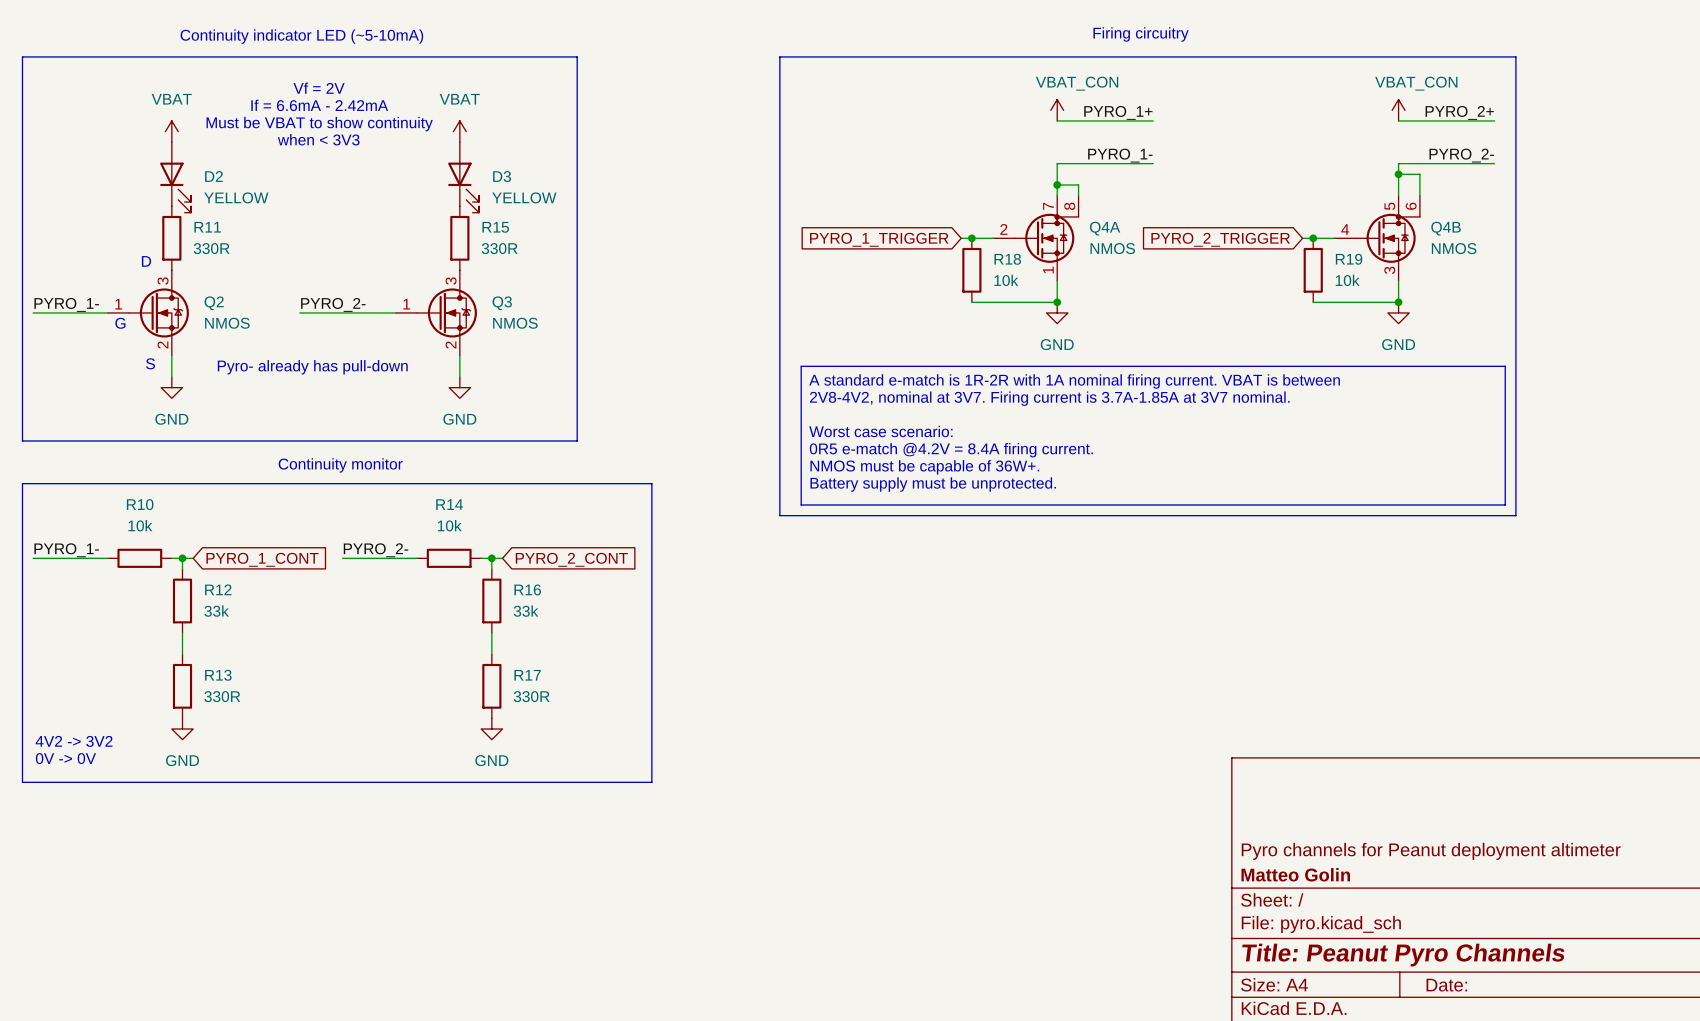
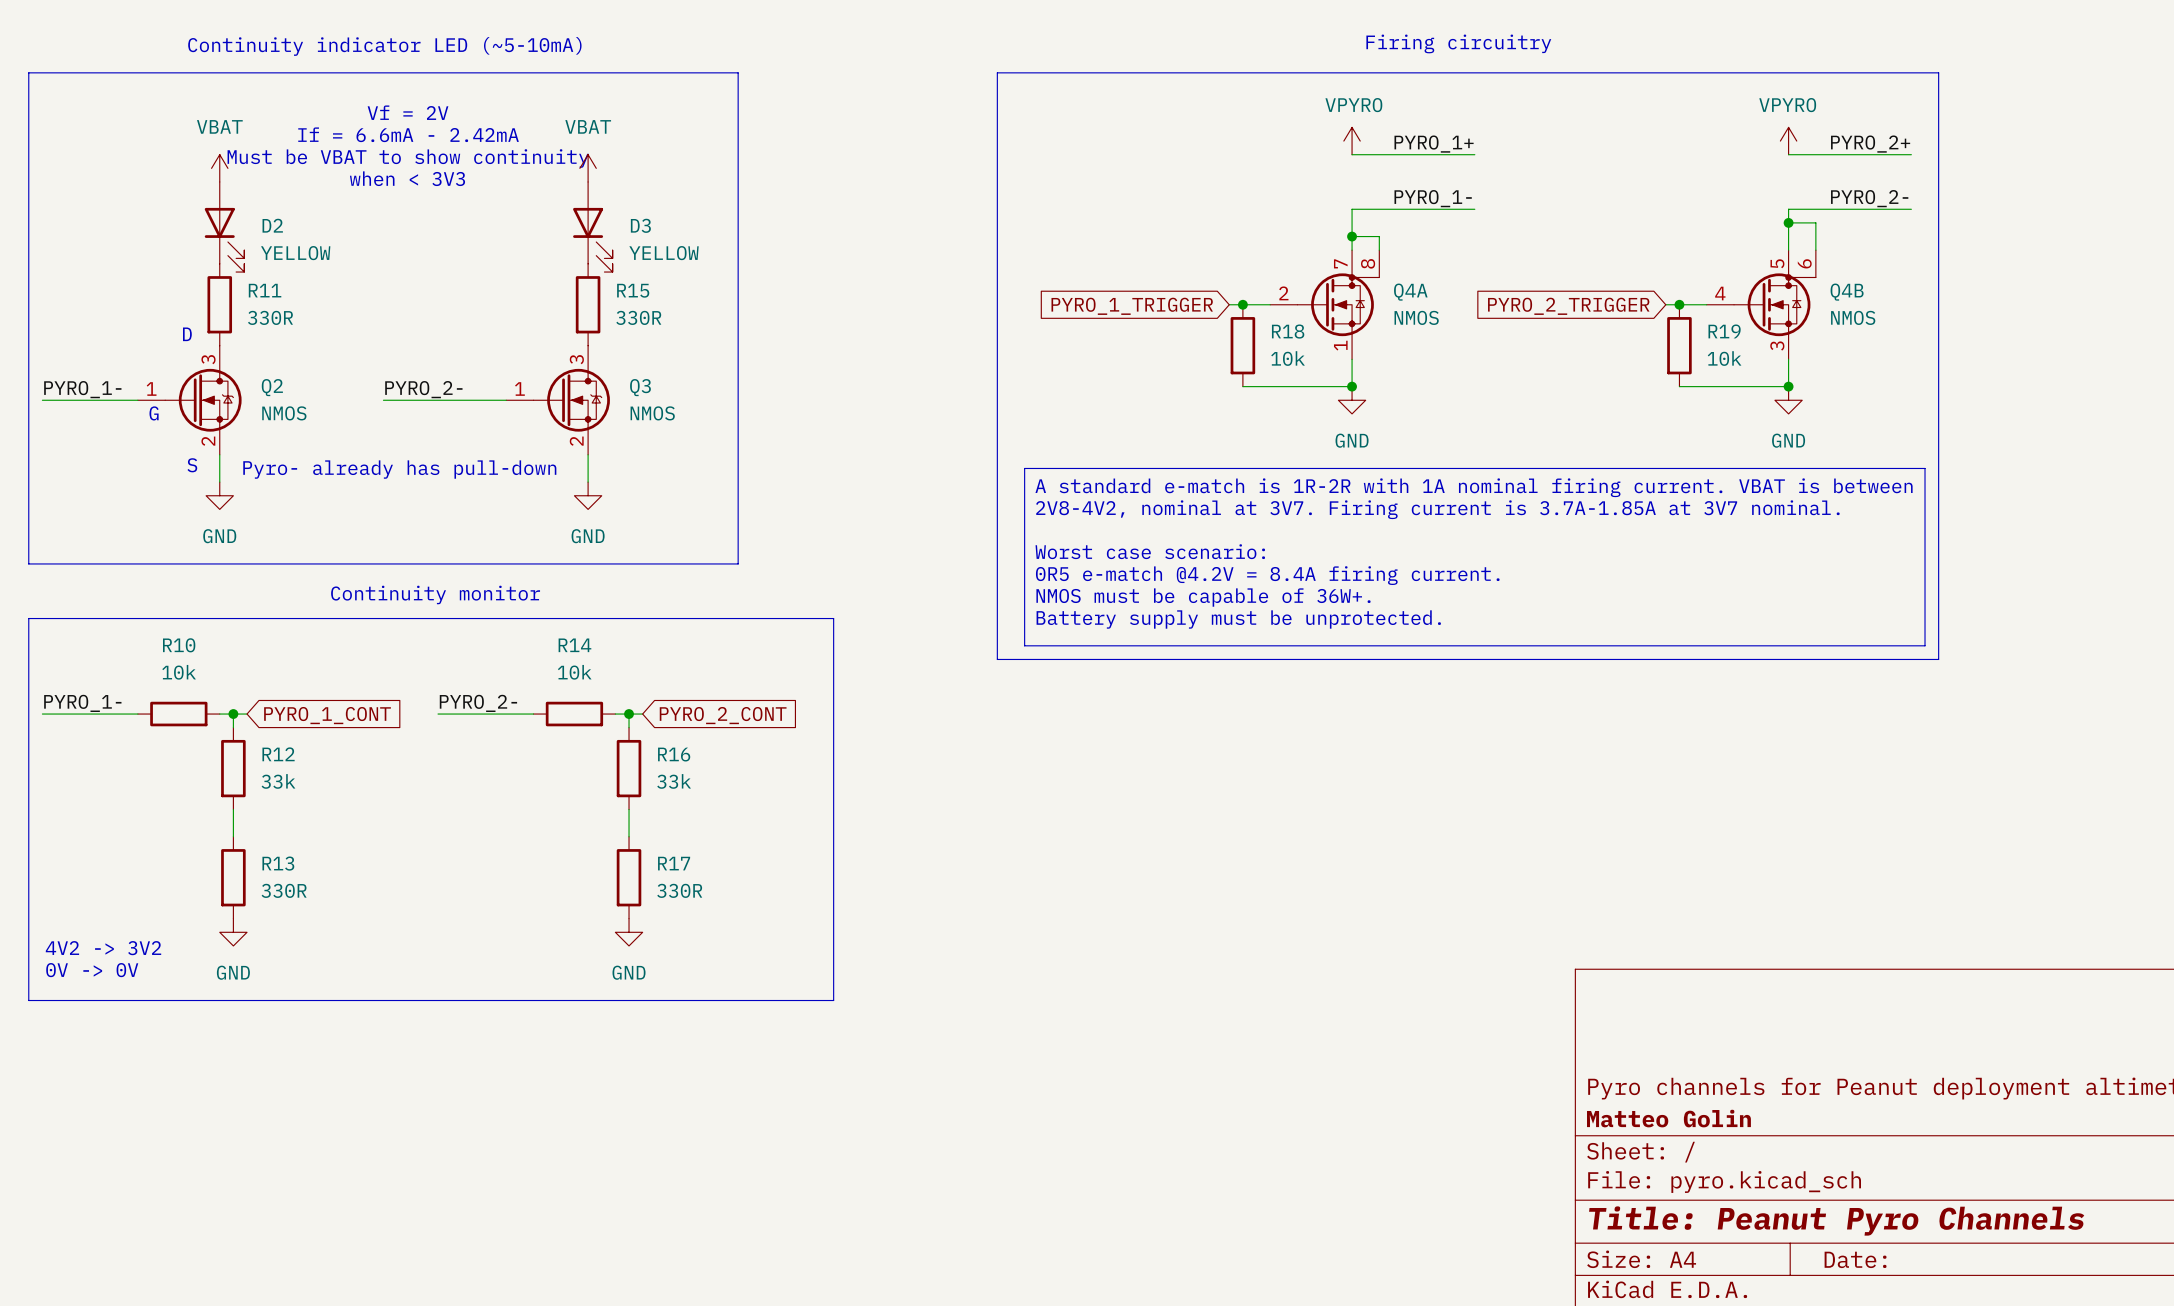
power symbol: VBAT_CON (1057, 110) -> VPYRO (1352, 141)
power symbol: VBAT_CON (1398, 110) -> VPYRO (1788, 141)

